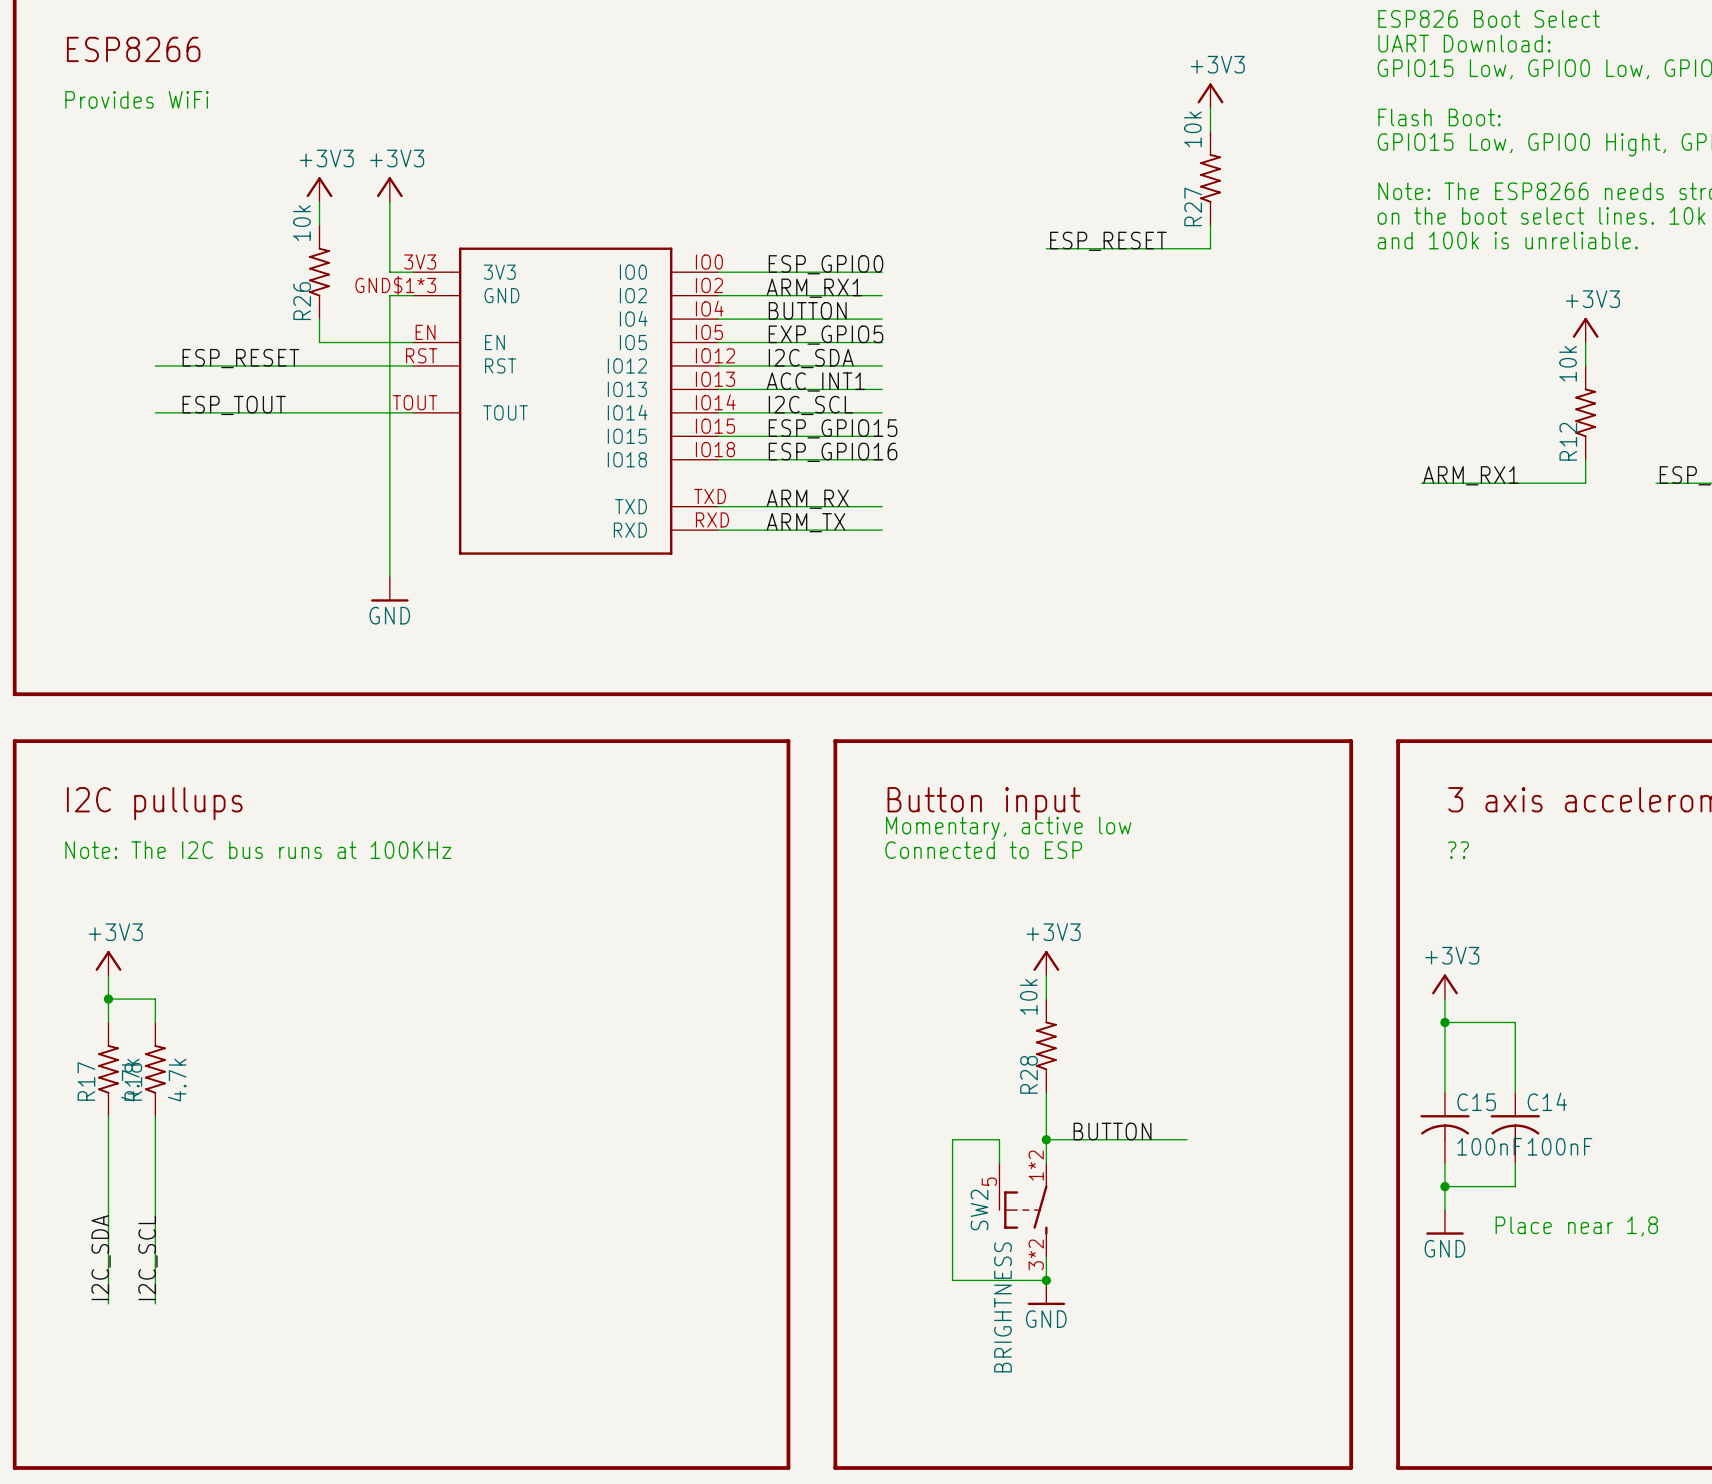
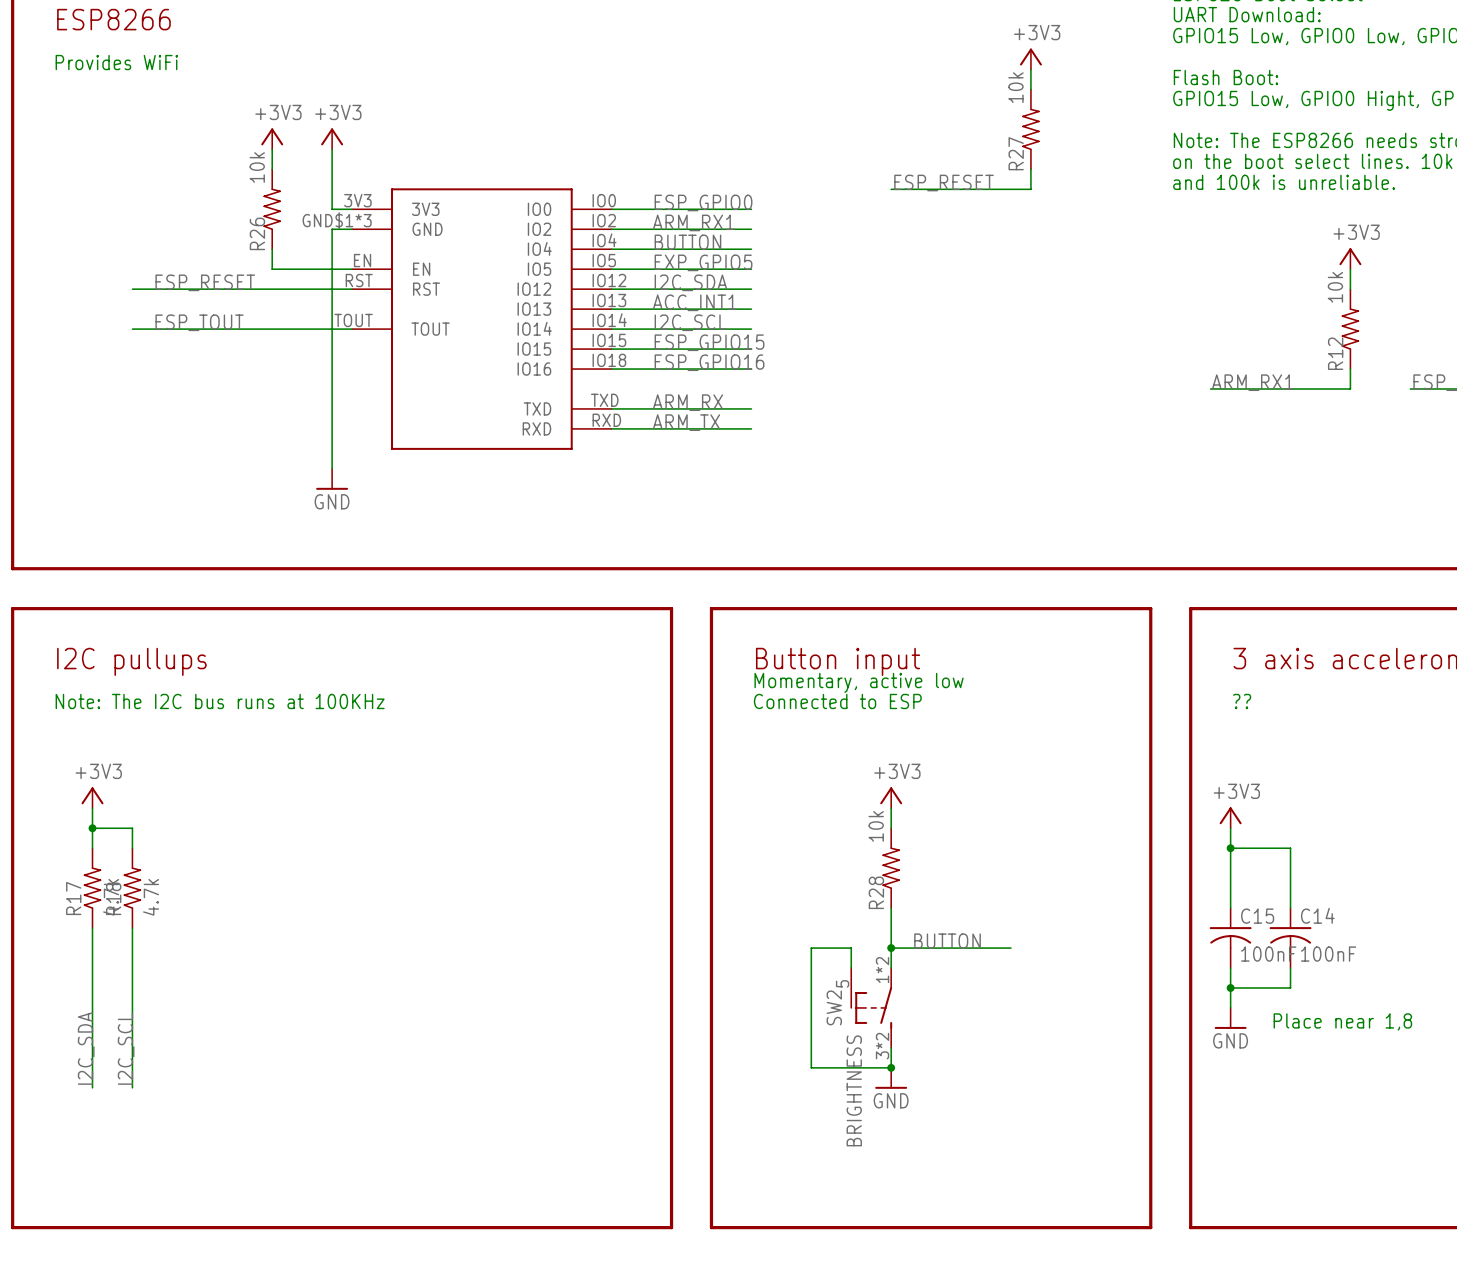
part pin name: IO18 (627, 459) -> IO16 (534, 369)

